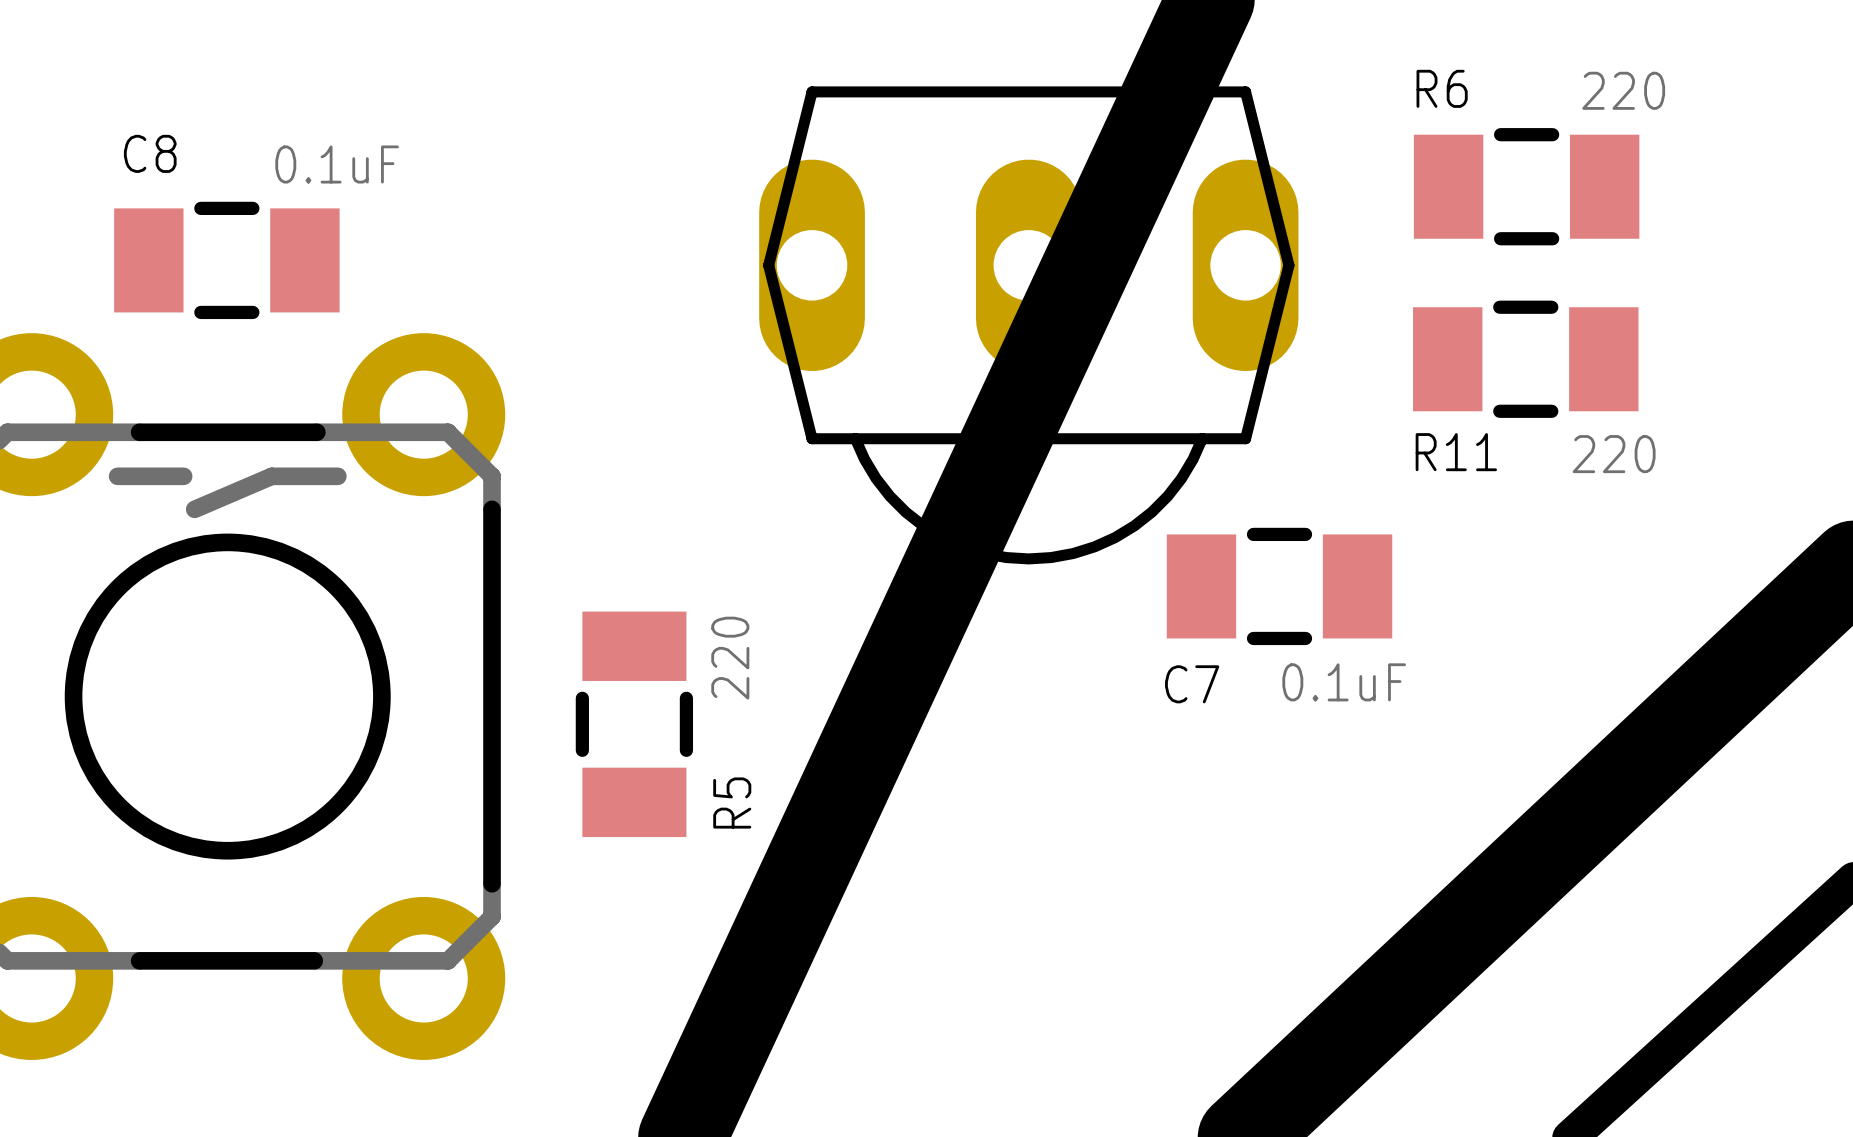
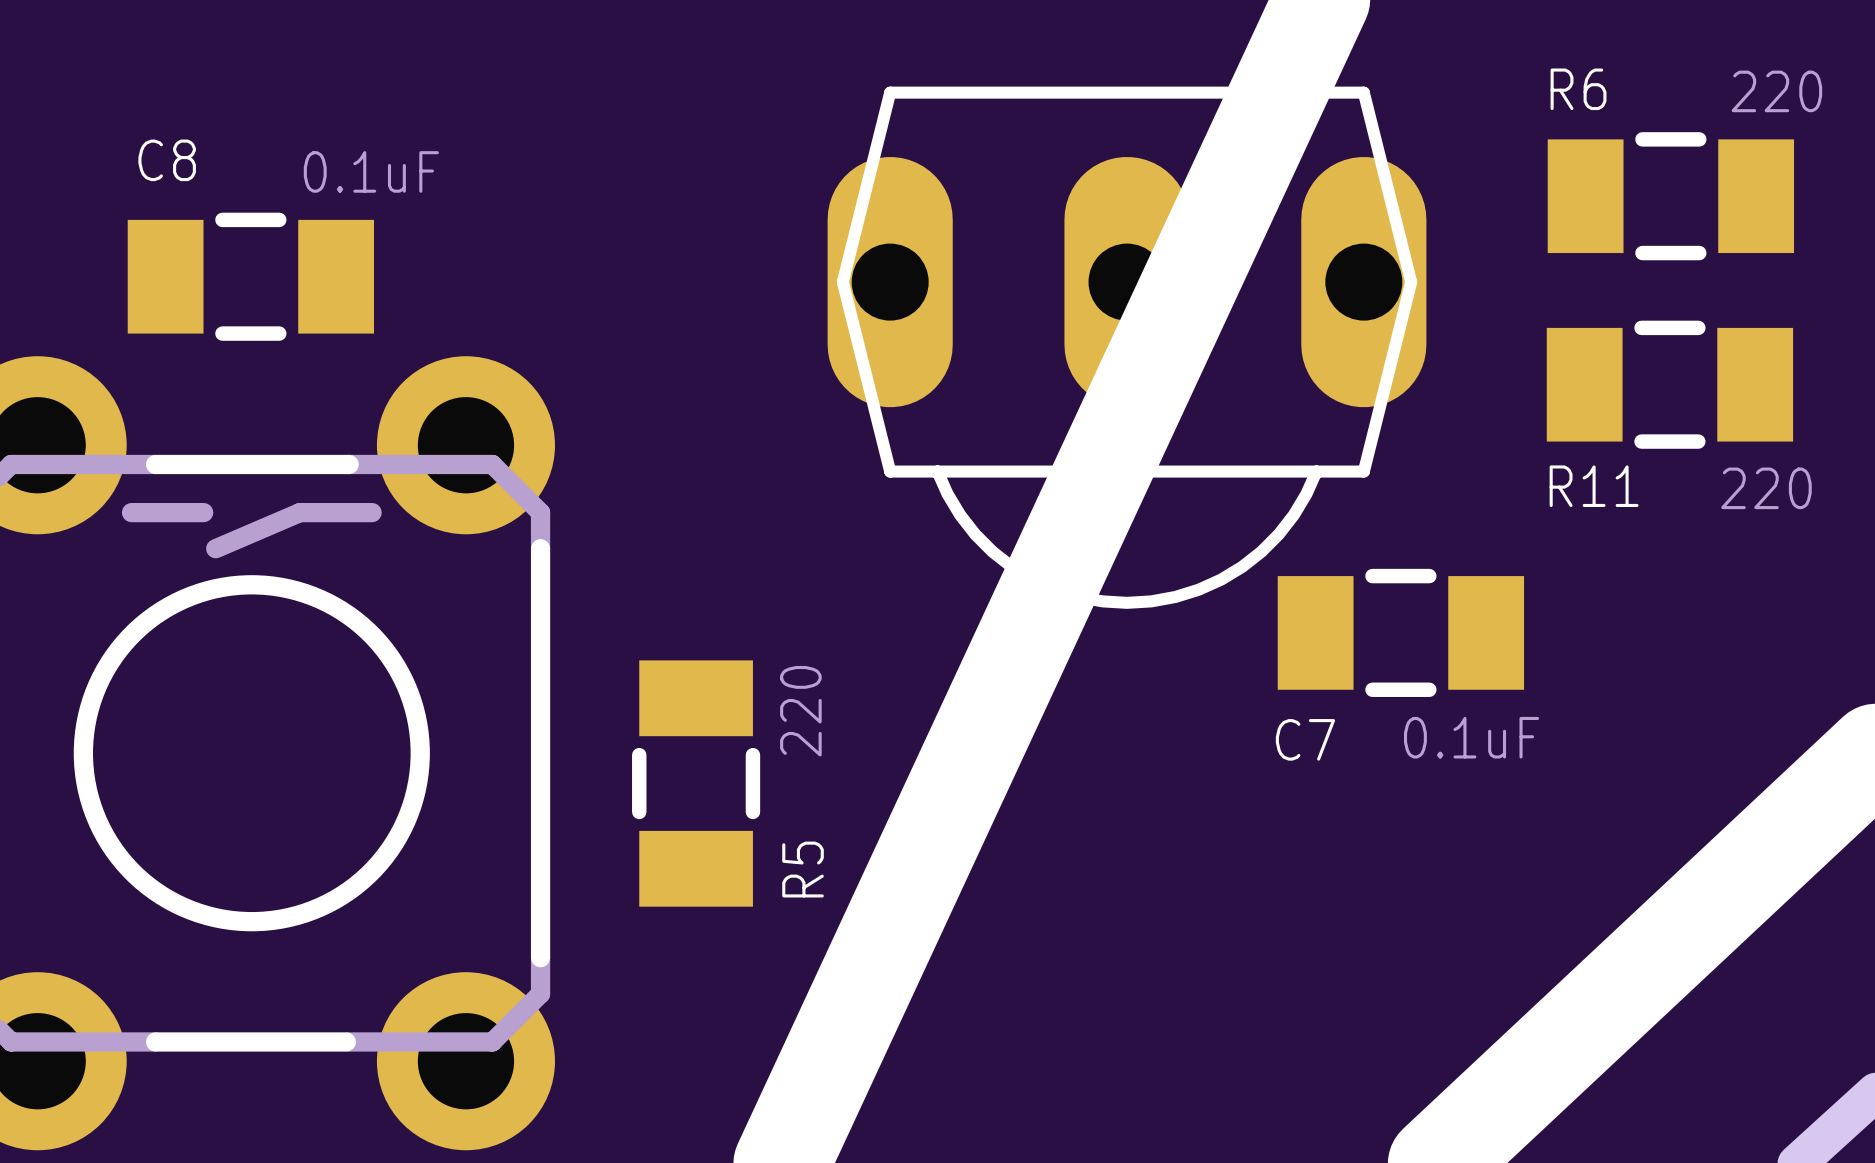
part footprint: [759, 86, 1299, 565] -> [827, 86, 1427, 609]

